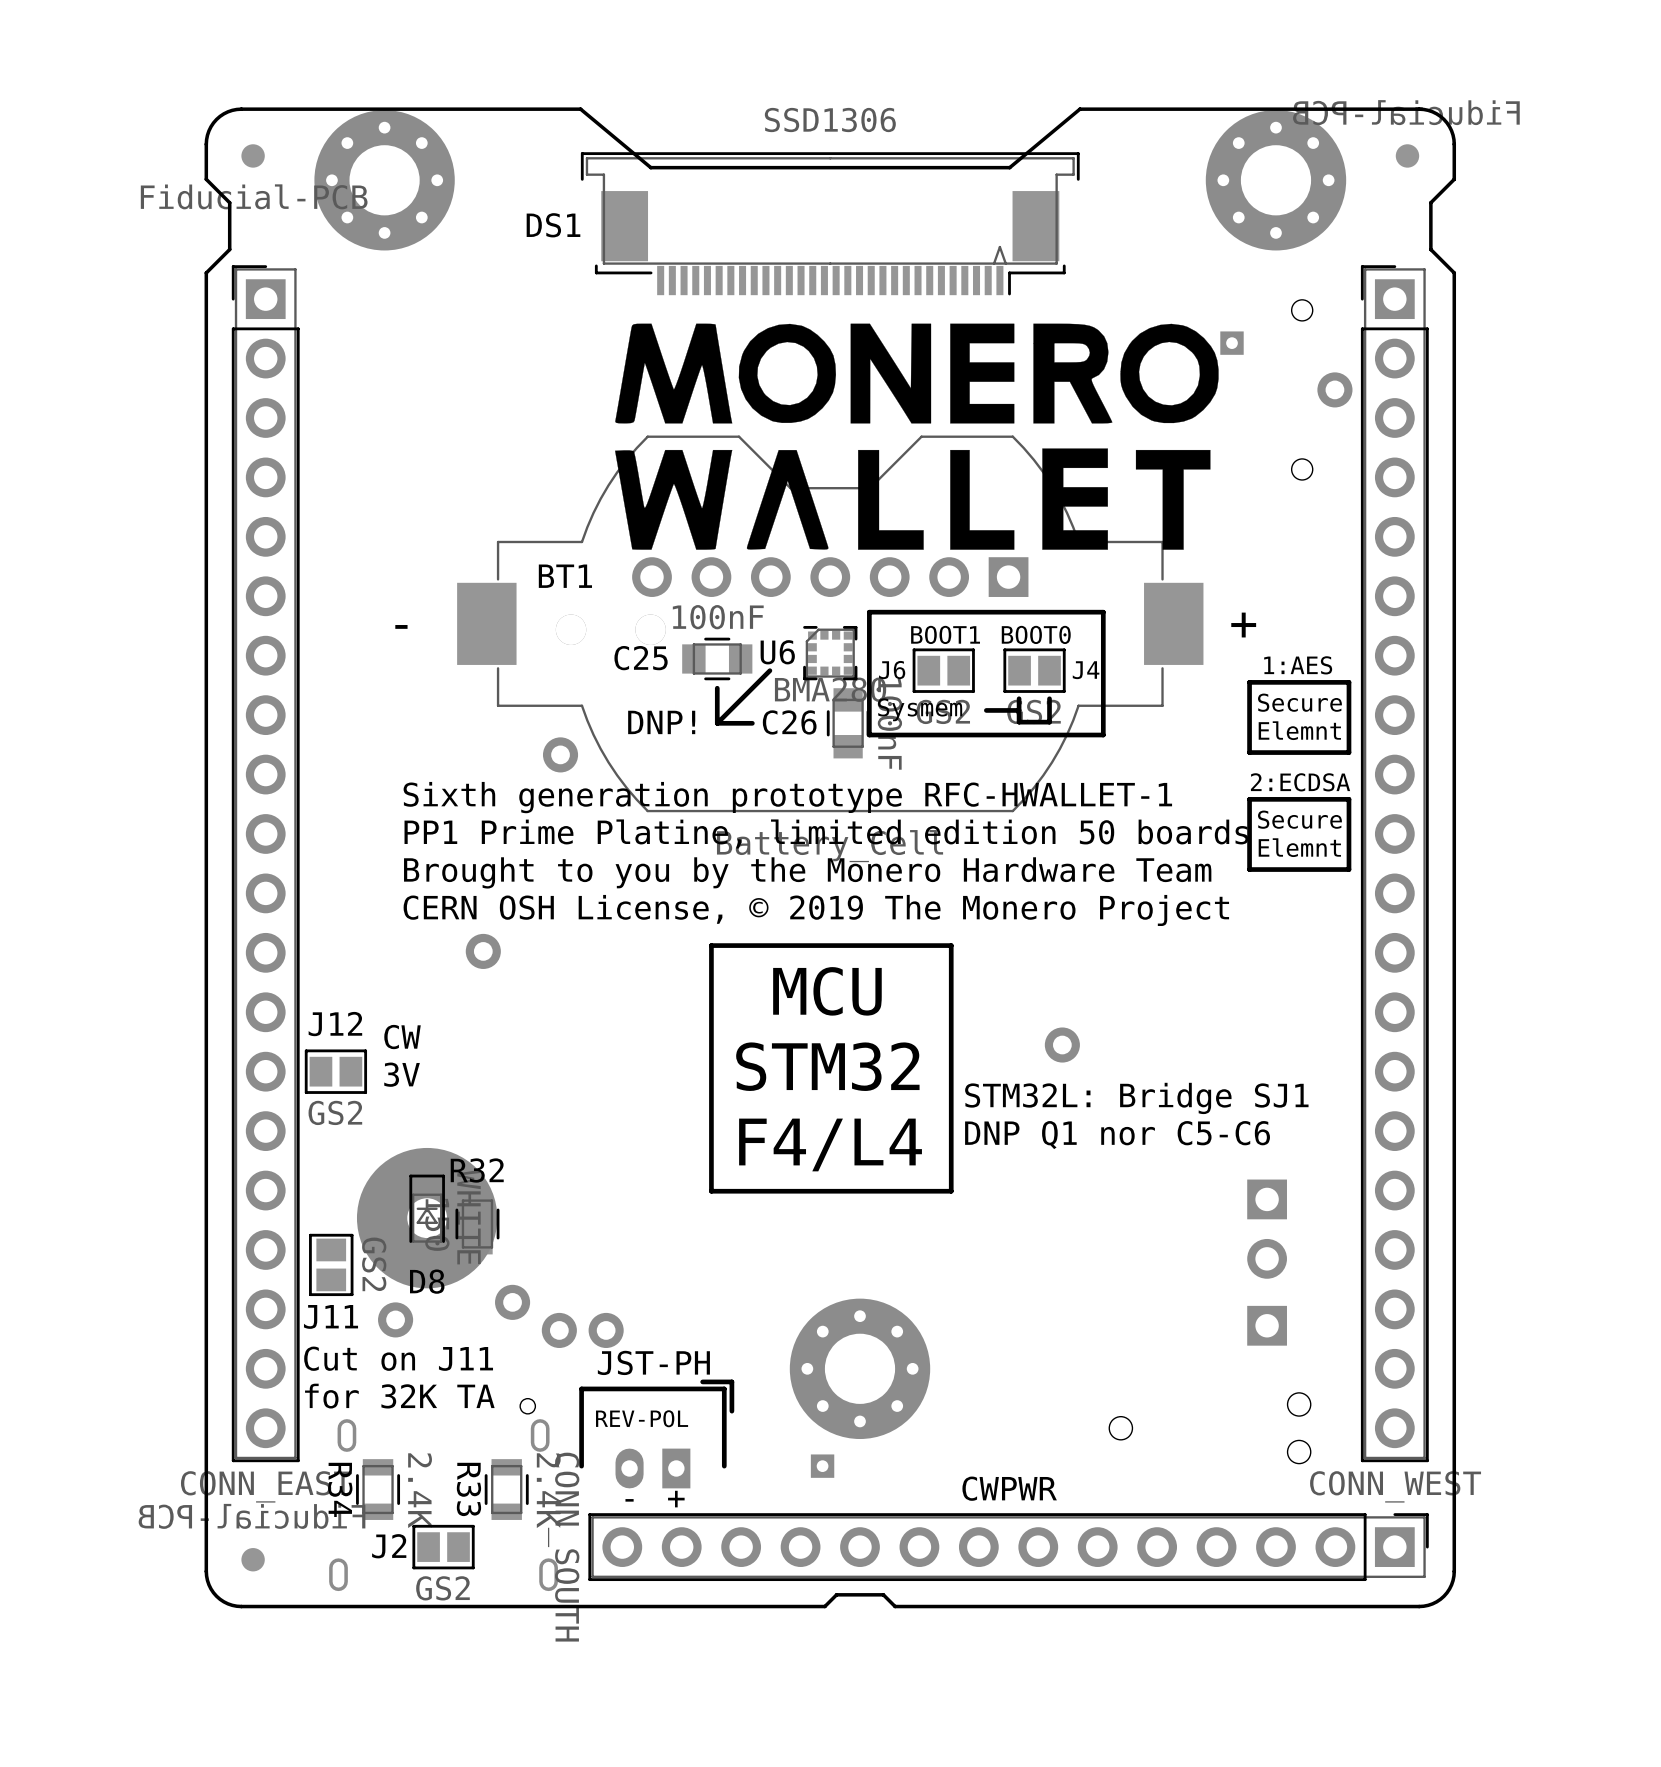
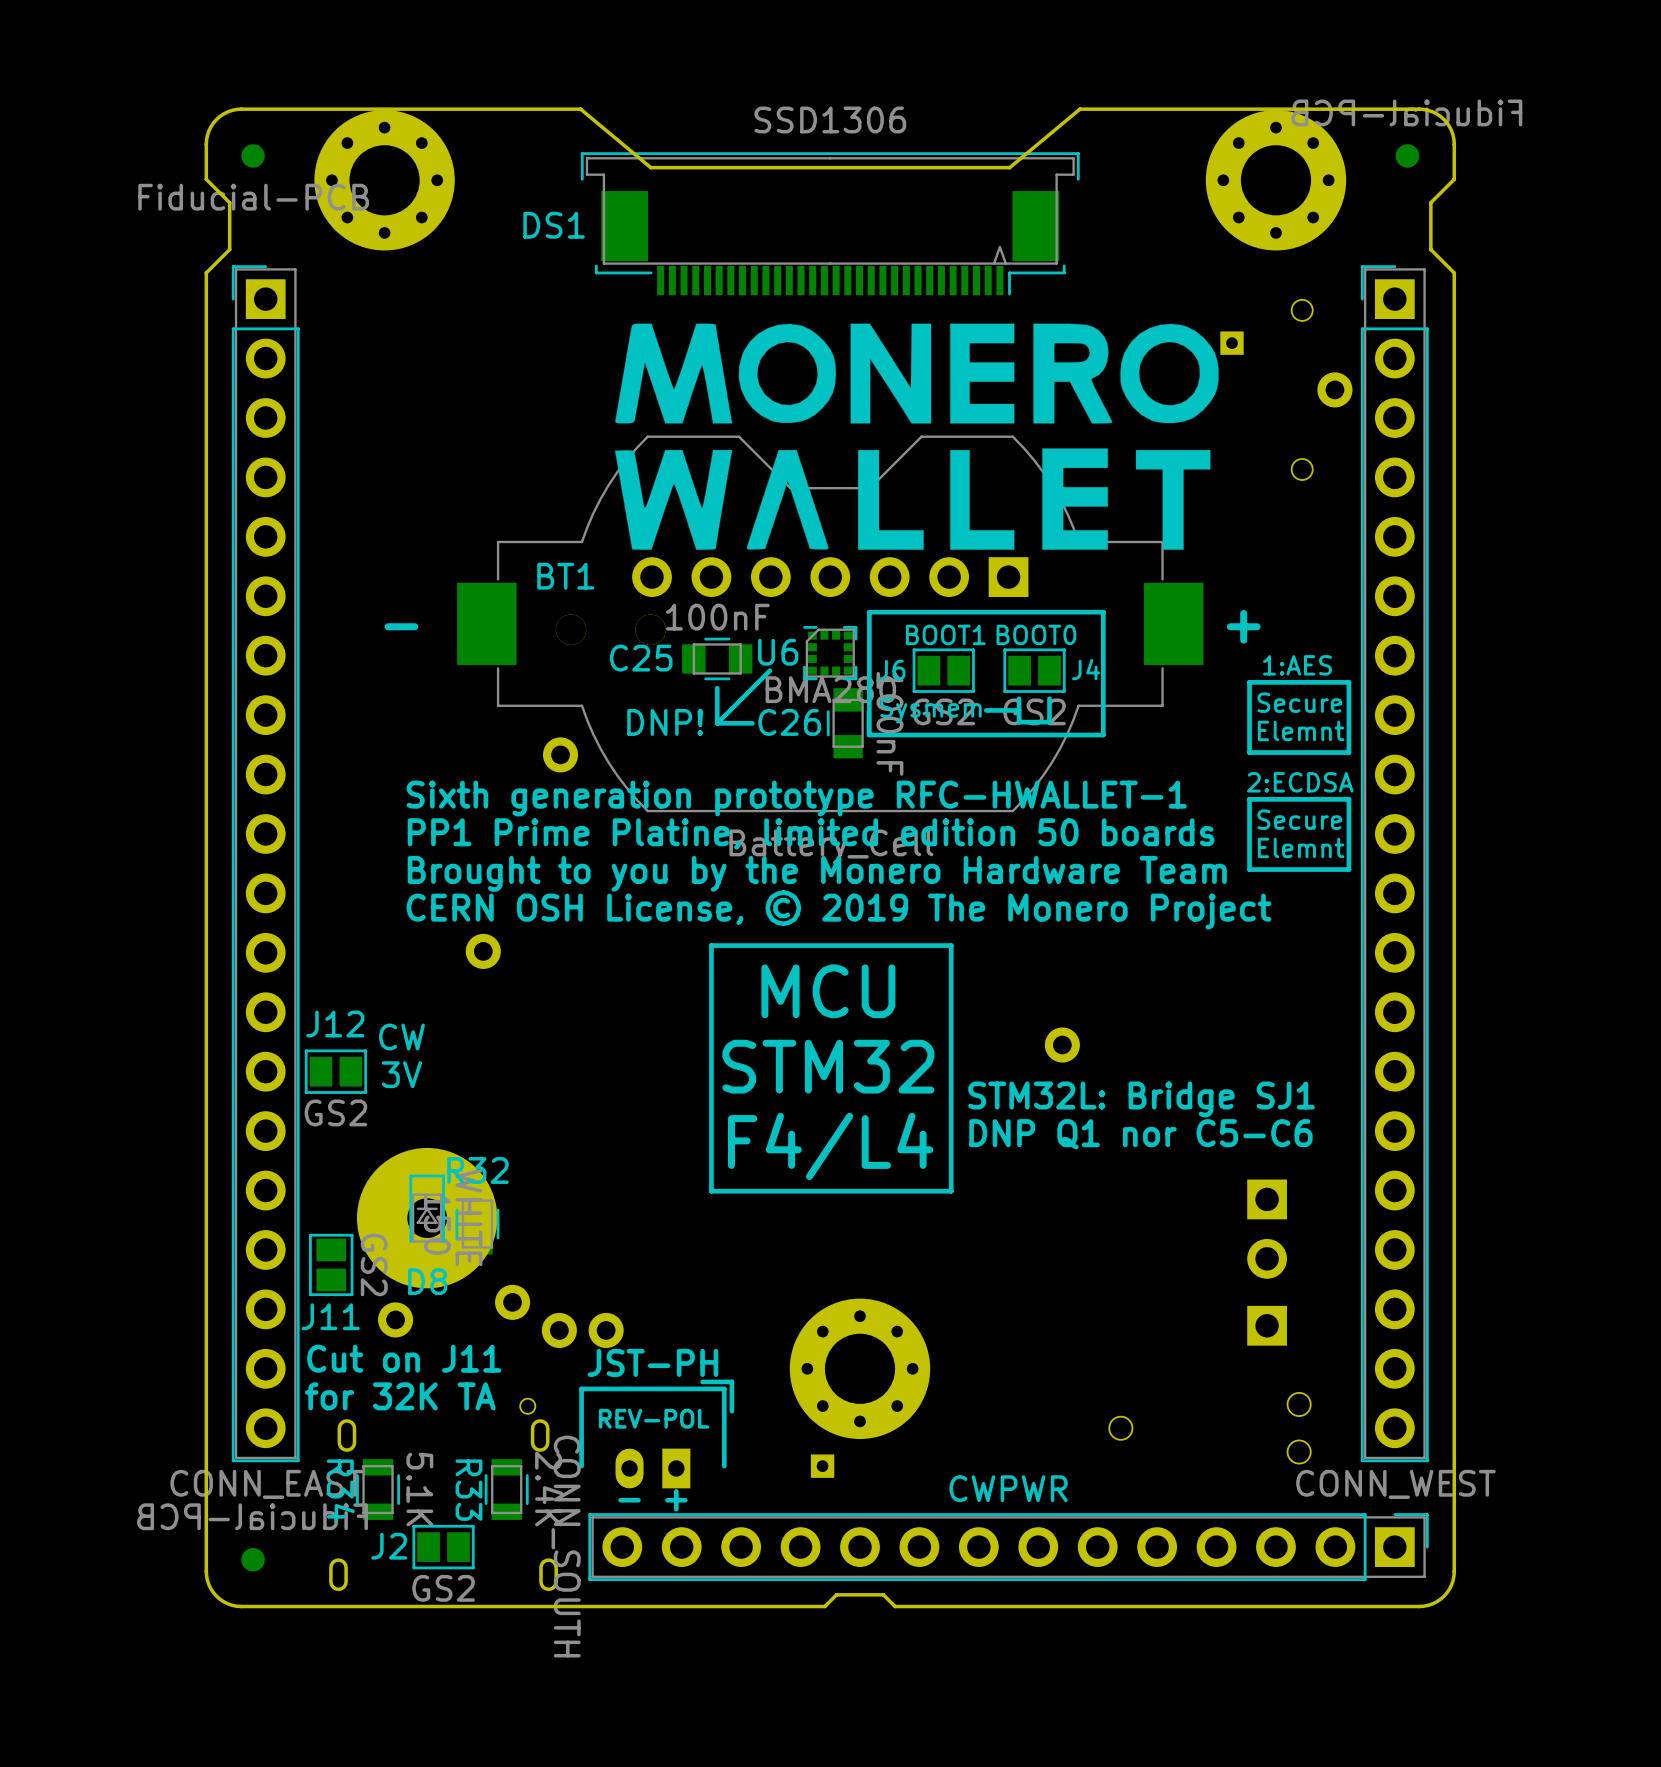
R34 value: 2.4K (420, 1490) -> 5.1K (419, 1489)

